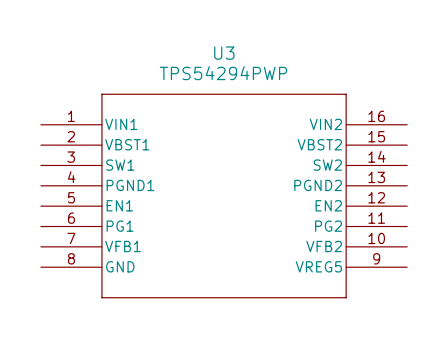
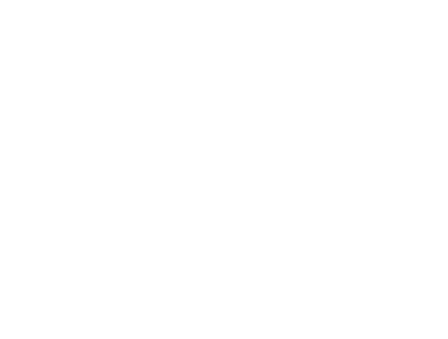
U3: TPS54294PWP (224, 195) -> none

